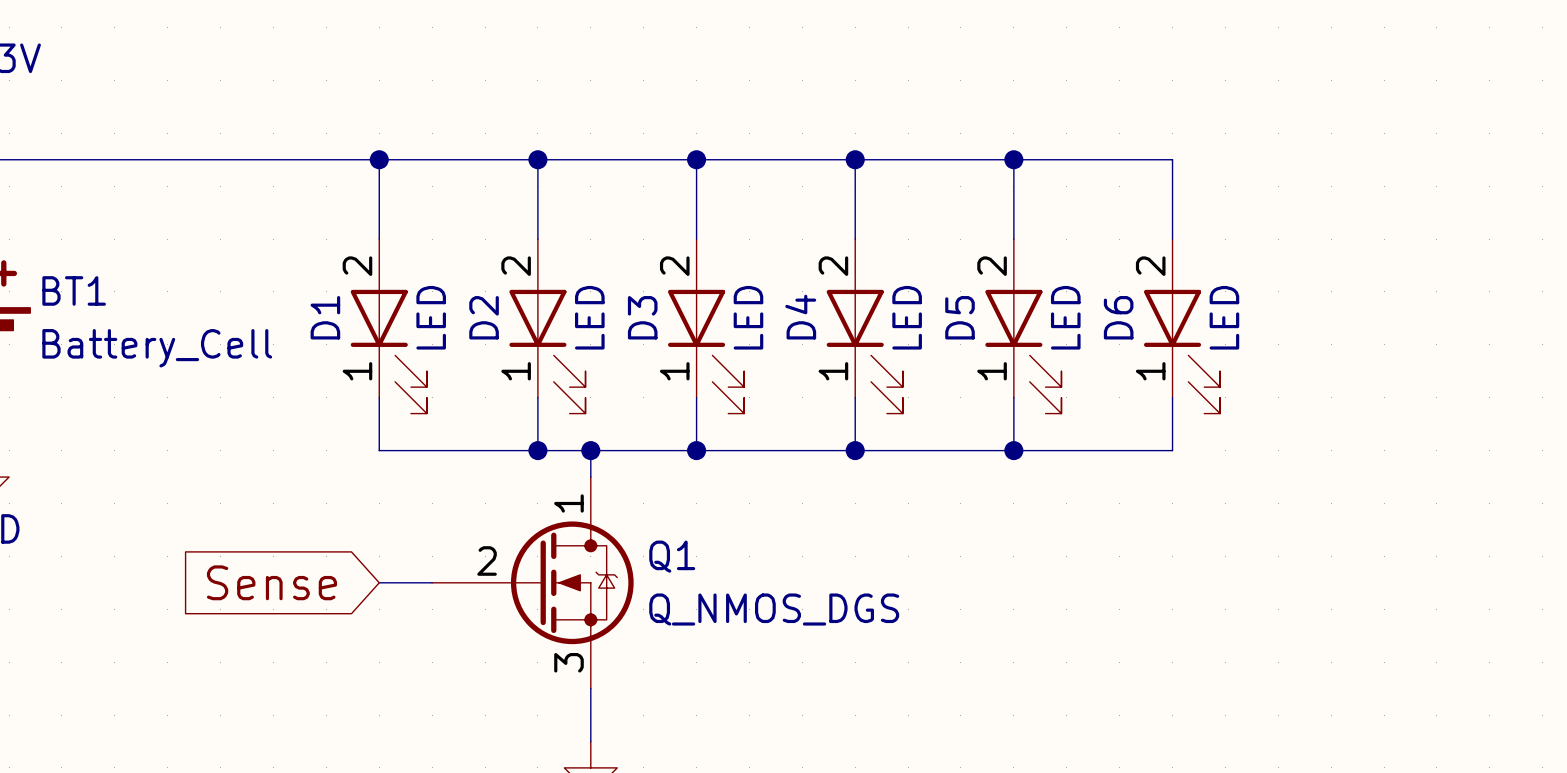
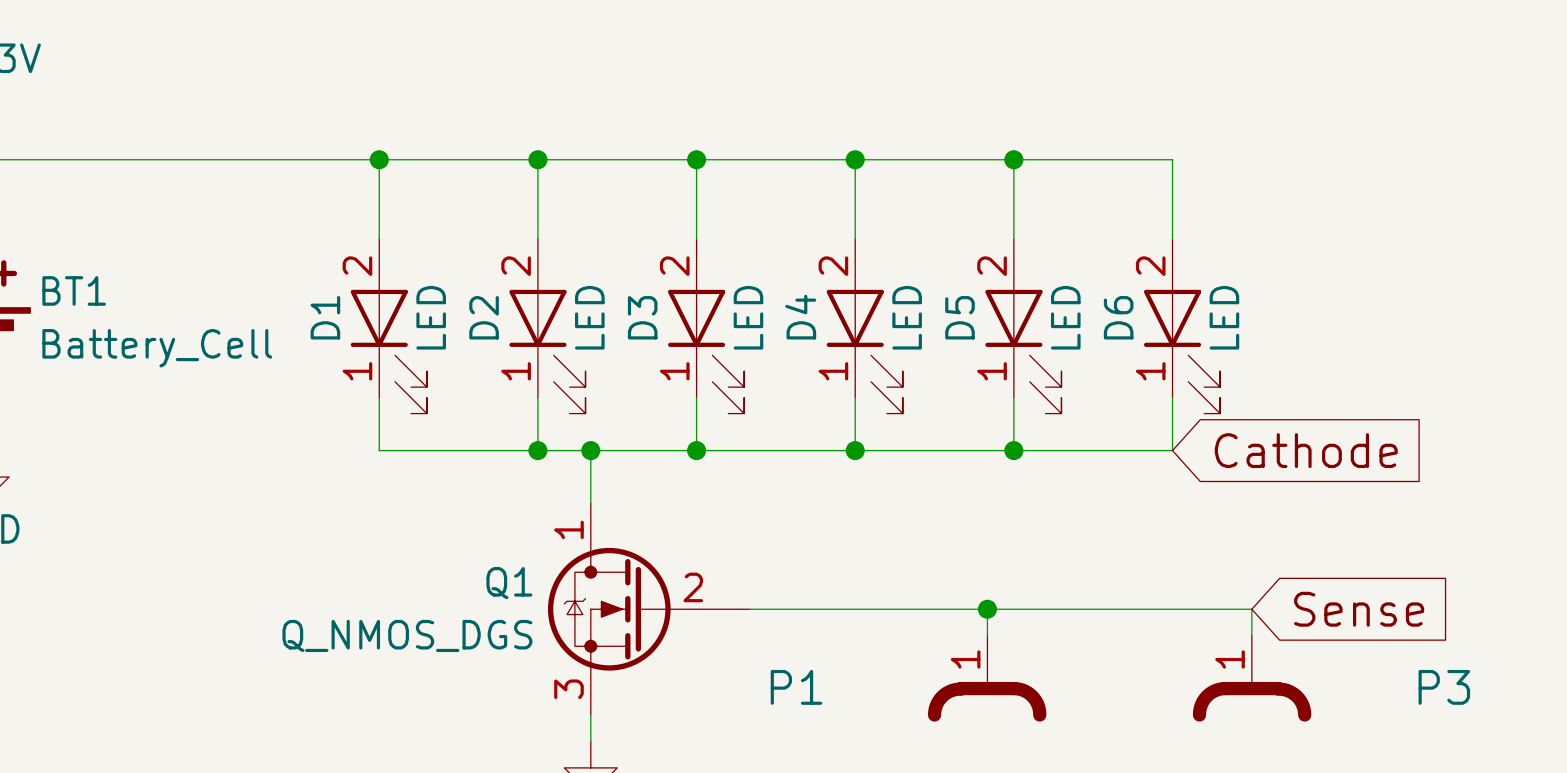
global label: none -> Cathode (1306, 450)
global label: Sense (271, 582) -> none
wire: (379, 582) (432, 582) -> none
Q1 flip: as is (572, 582) -> left-right (609, 609)
wire: none -> (749, 609) (1251, 609) (1251, 635)
wire: none -> (987, 609) (987, 635)
junction: none -> (987, 609)
global label: none -> Sense (1359, 609)
P1: none -> (987, 678)
P3: none -> (1252, 678)

